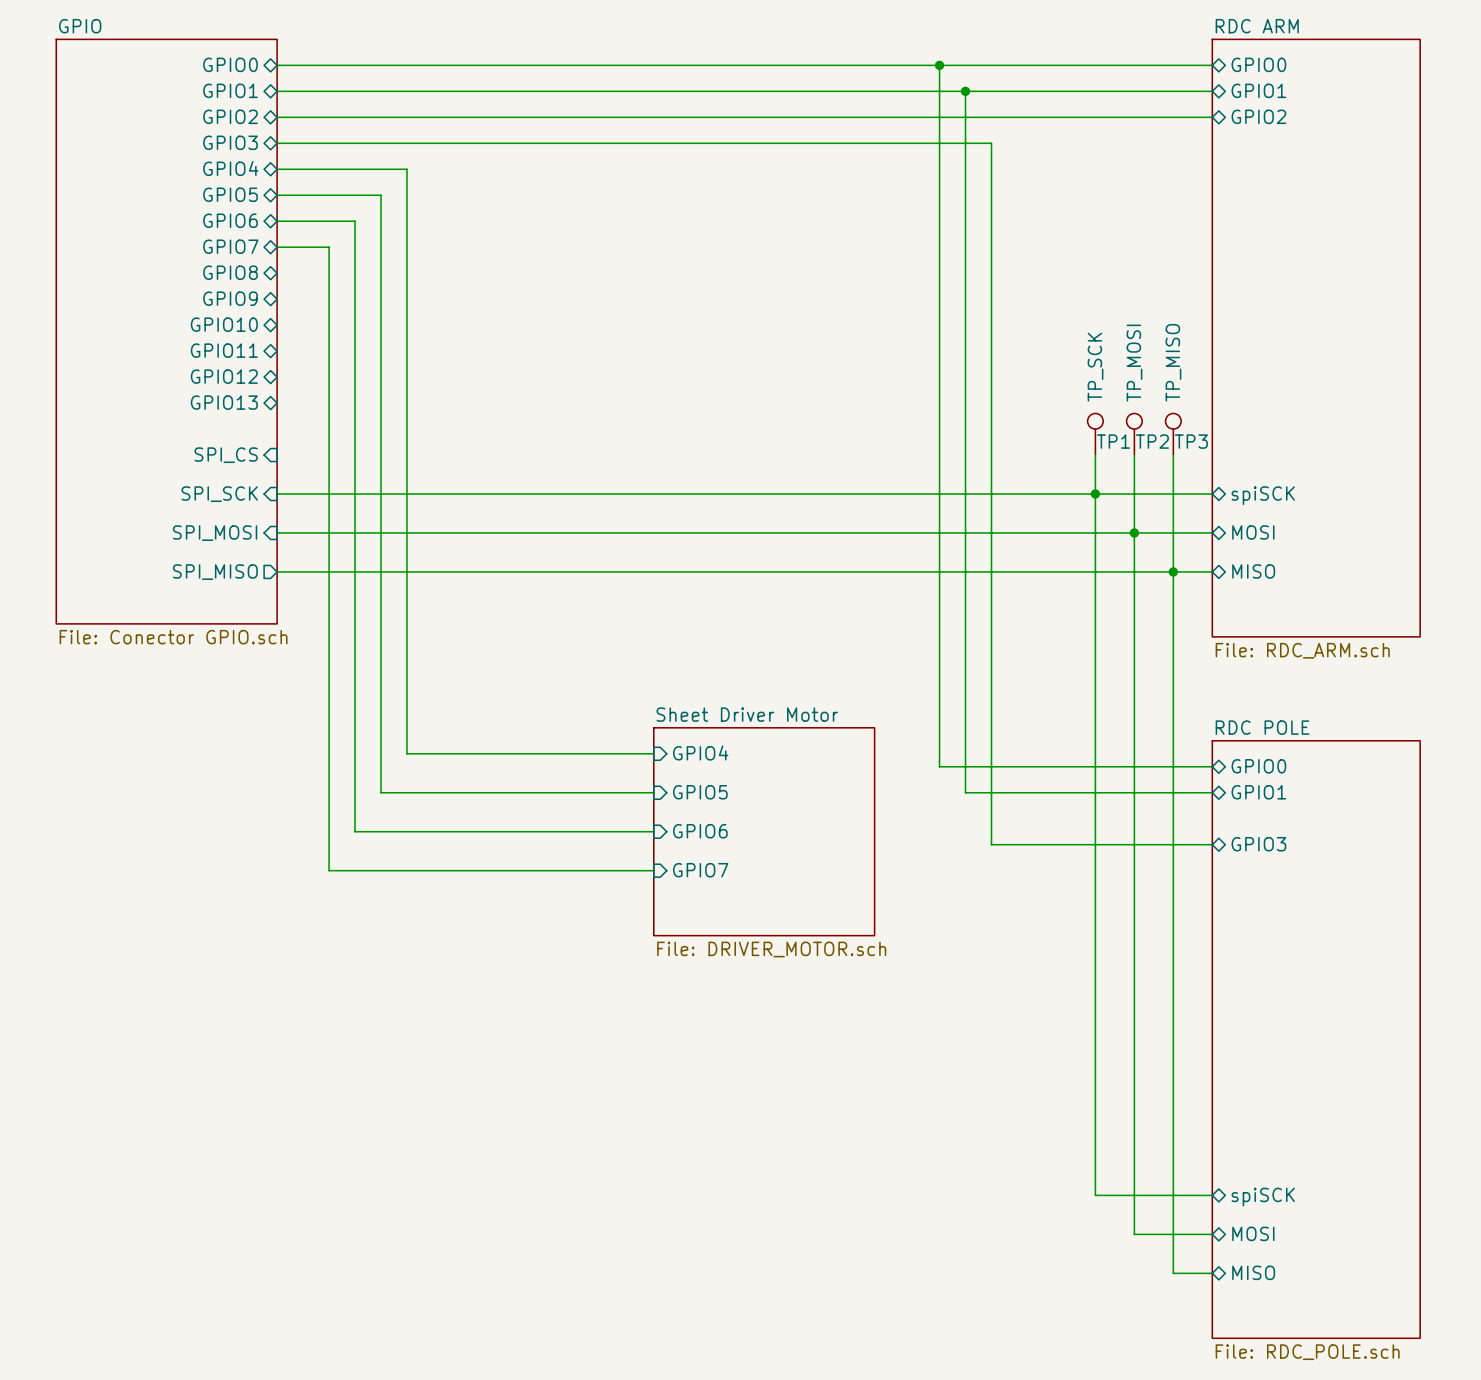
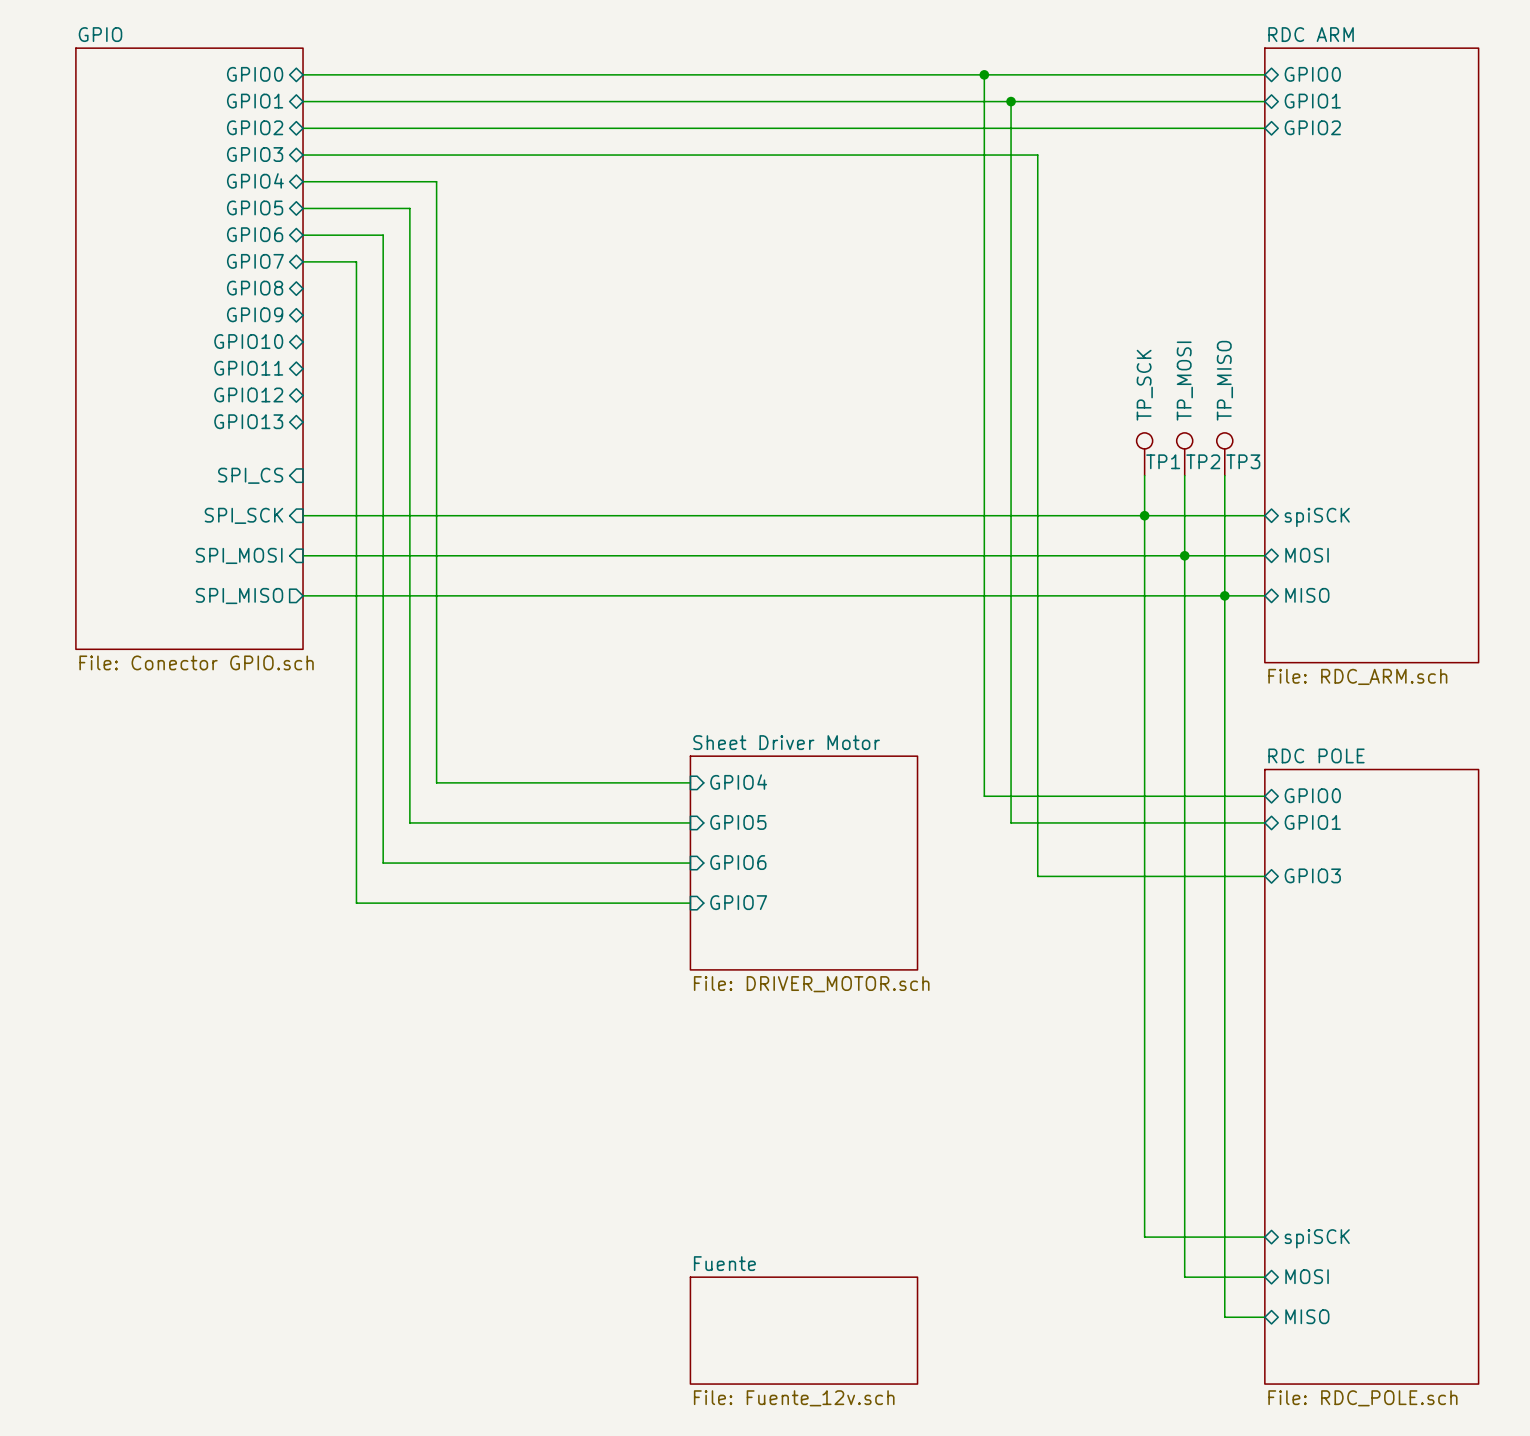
sheet Fuente: none -> File: Fuente_12v.sch (803, 1330)

